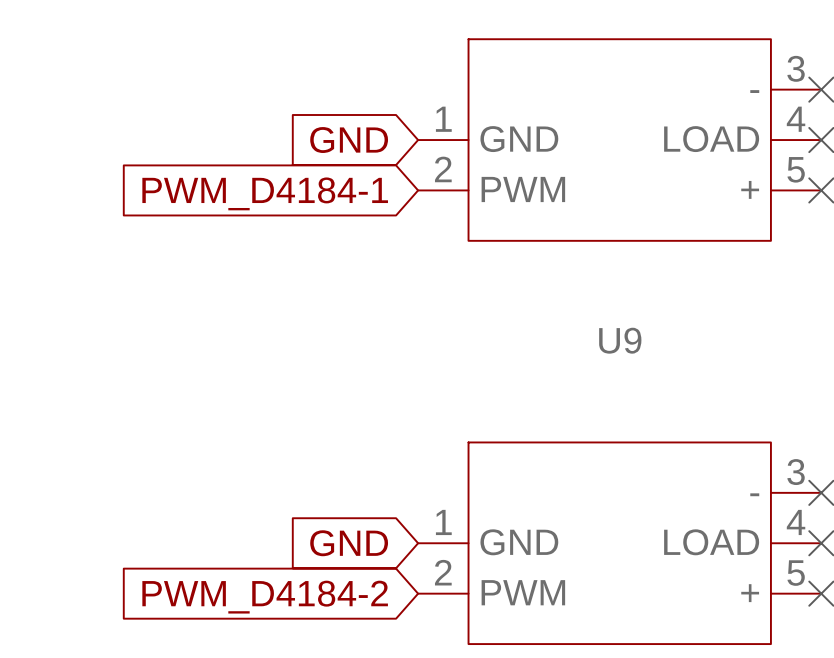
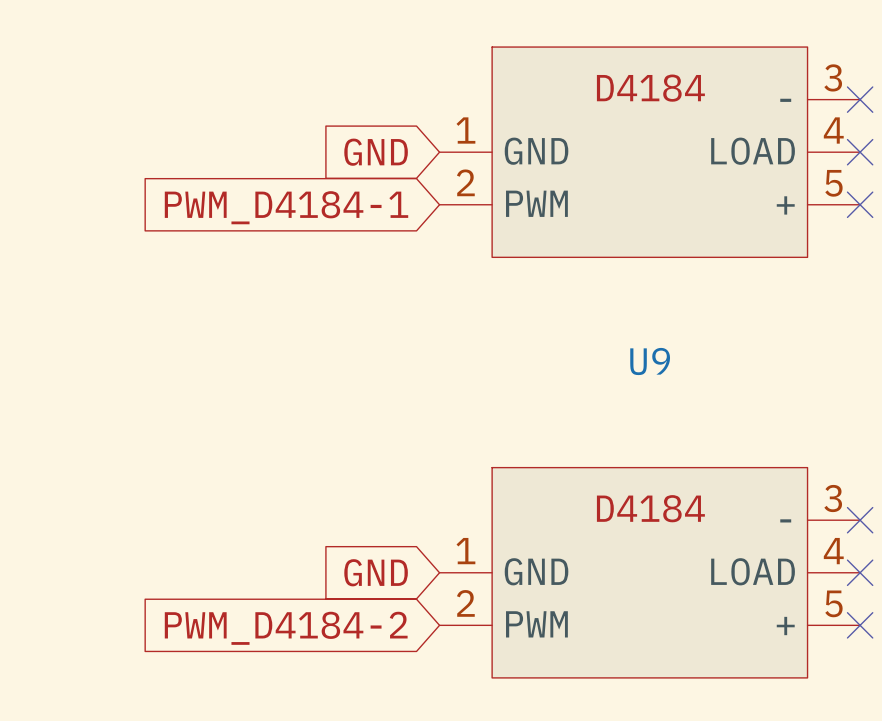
part text: none -> D4184 (650, 88)
U9 text: none -> D4184 (650, 508)

